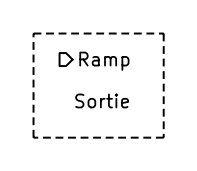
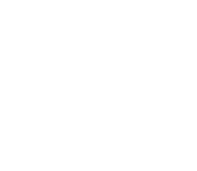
line: (33, 33) (163, 33) (163, 137) (33, 137) (33, 33) -> none
hierarchical label: Ramp (104, 61) -> none
text: Sortie (102, 100) -> none

